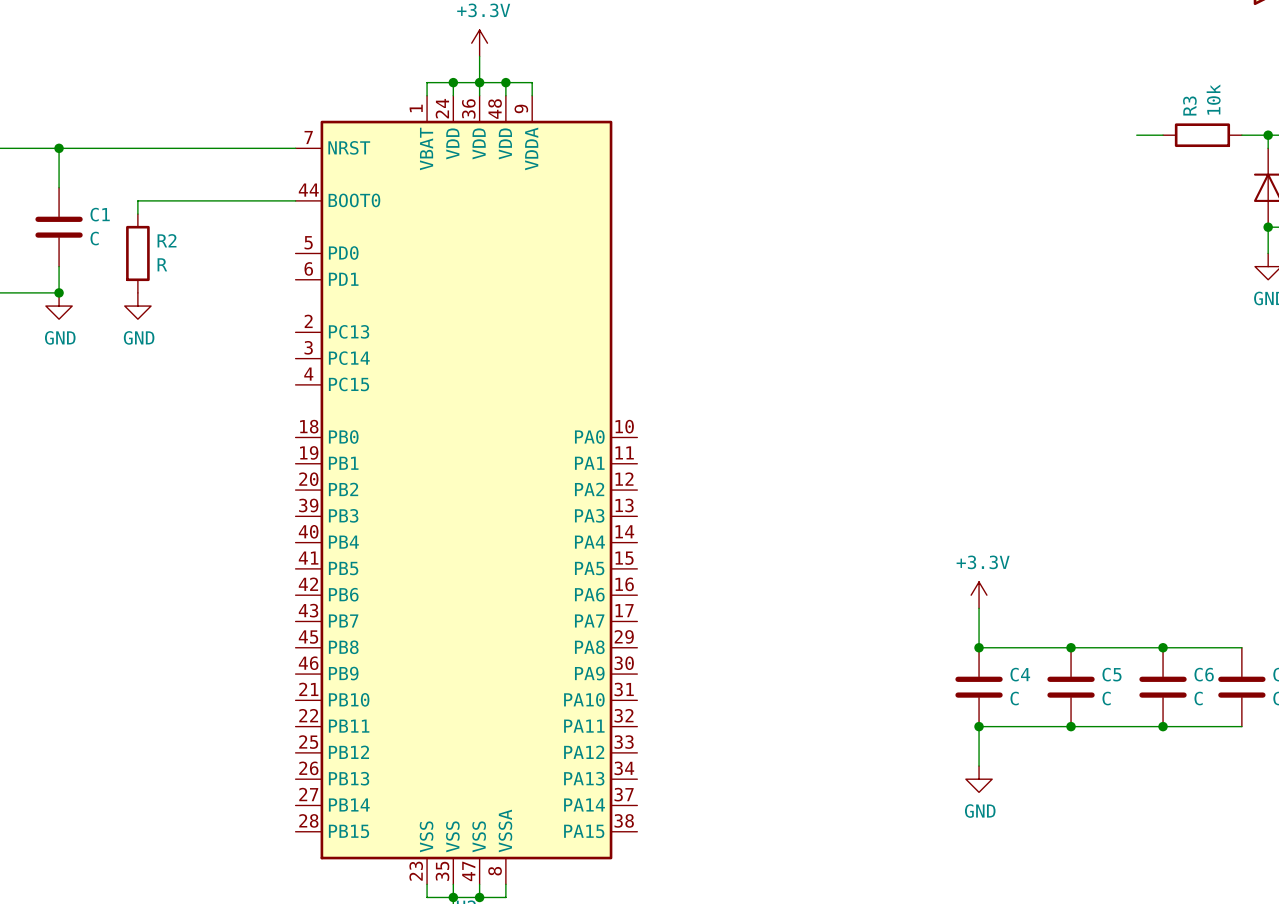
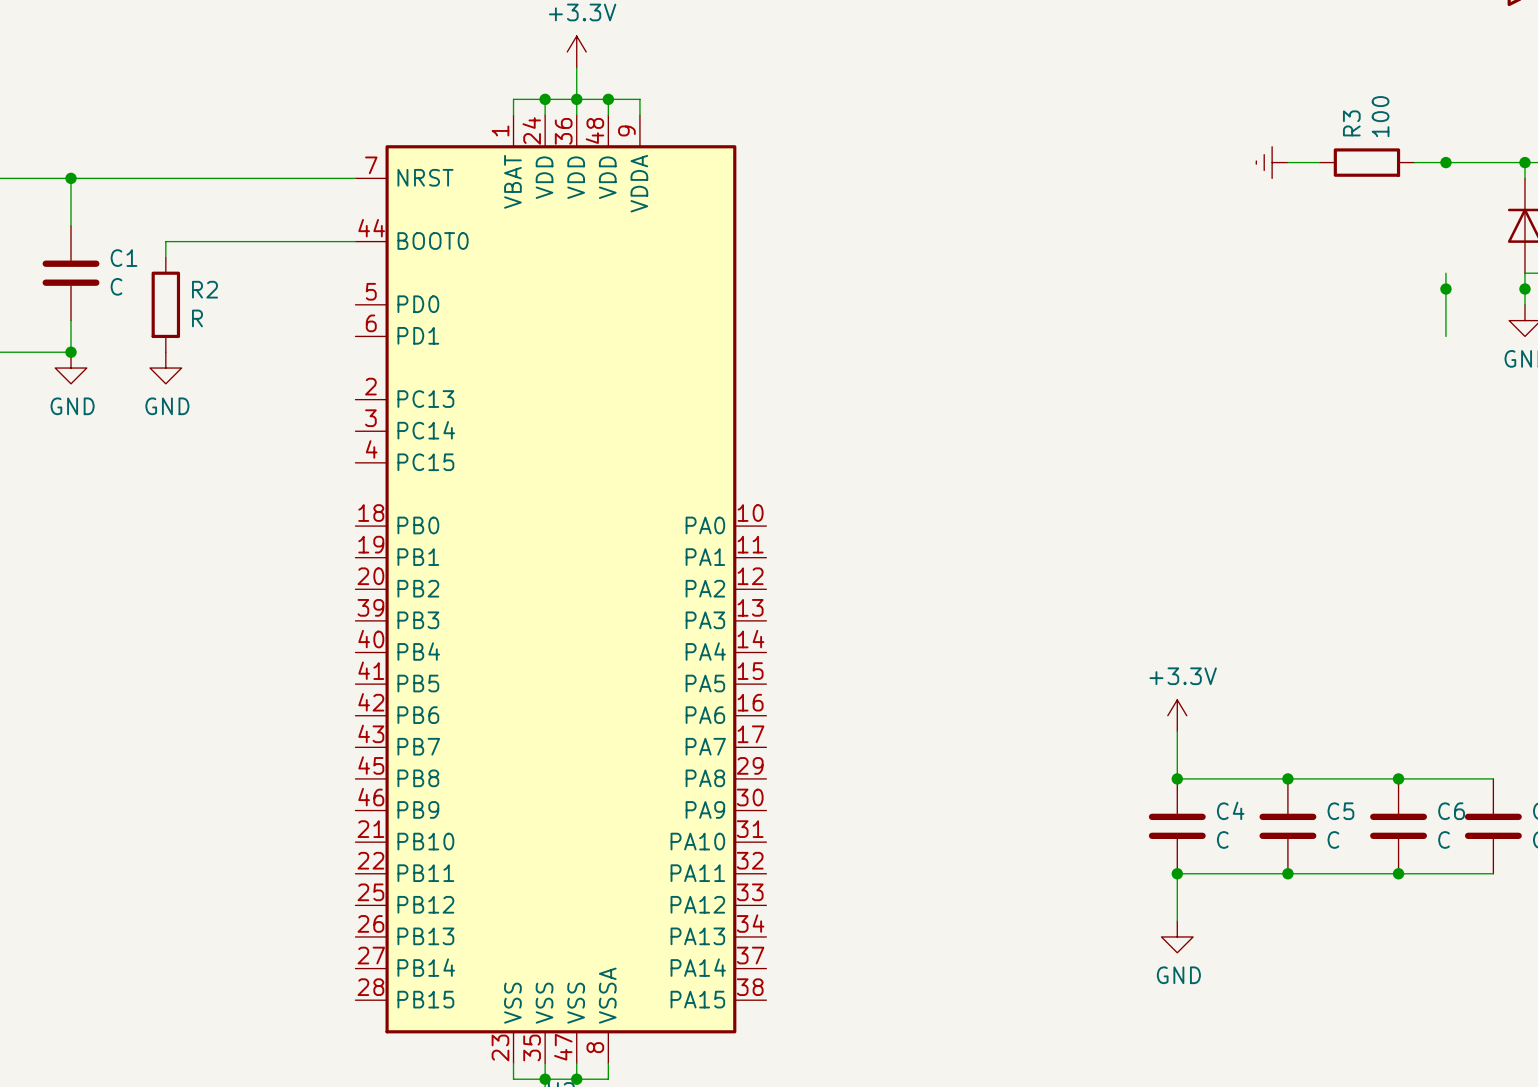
R3 value: 10k (1213, 99) -> 100 (1380, 116)
power symbol: none -> (1272, 162)
wire: (1136, 135) (1163, 135) -> (1287, 162) (1319, 162)
wire: none -> (1414, 162) (1493, 162)
R3 position: (1202, 135) -> (1366, 162)
junction: none -> (1445, 162)
wire: none -> (1445, 273) (1445, 336)
junction position: (1268, 227) -> (1524, 289)
junction: none -> (1445, 289)

